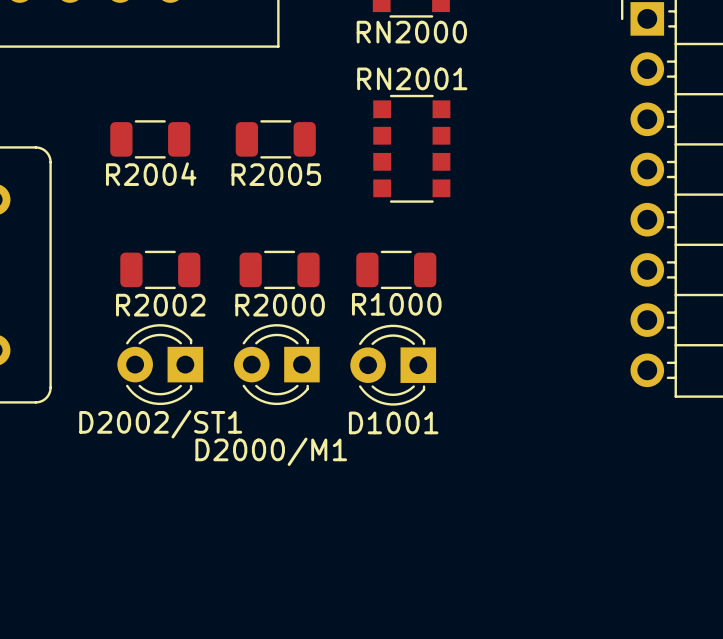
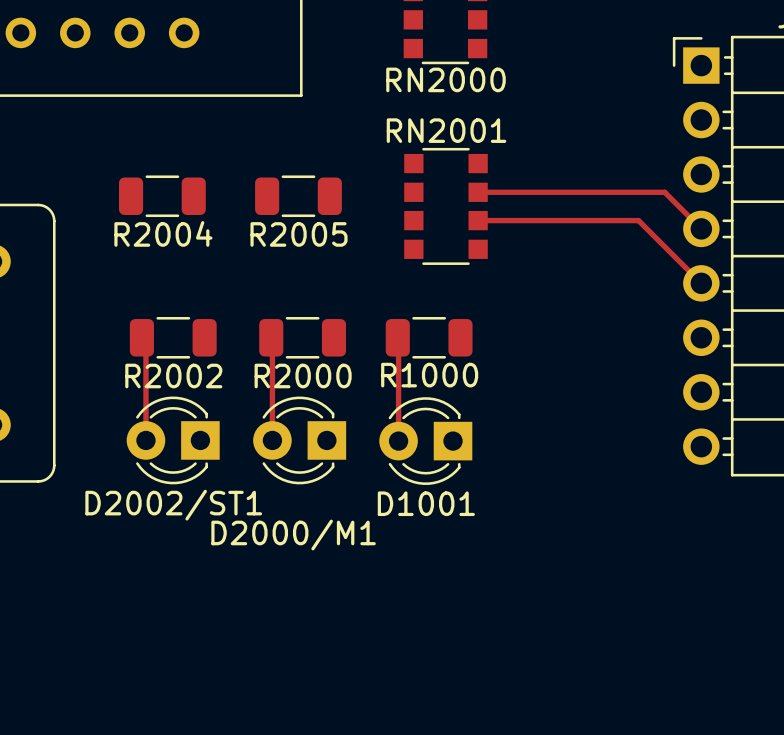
track: none -> (478, 192) (664, 192) (701, 228)
track: none -> (478, 220) (638, 220) (701, 283)
track: none -> (141, 337) (145, 341) (145, 440)
track: none -> (271, 337) (272, 440)
track: none -> (397, 337) (398, 441)

